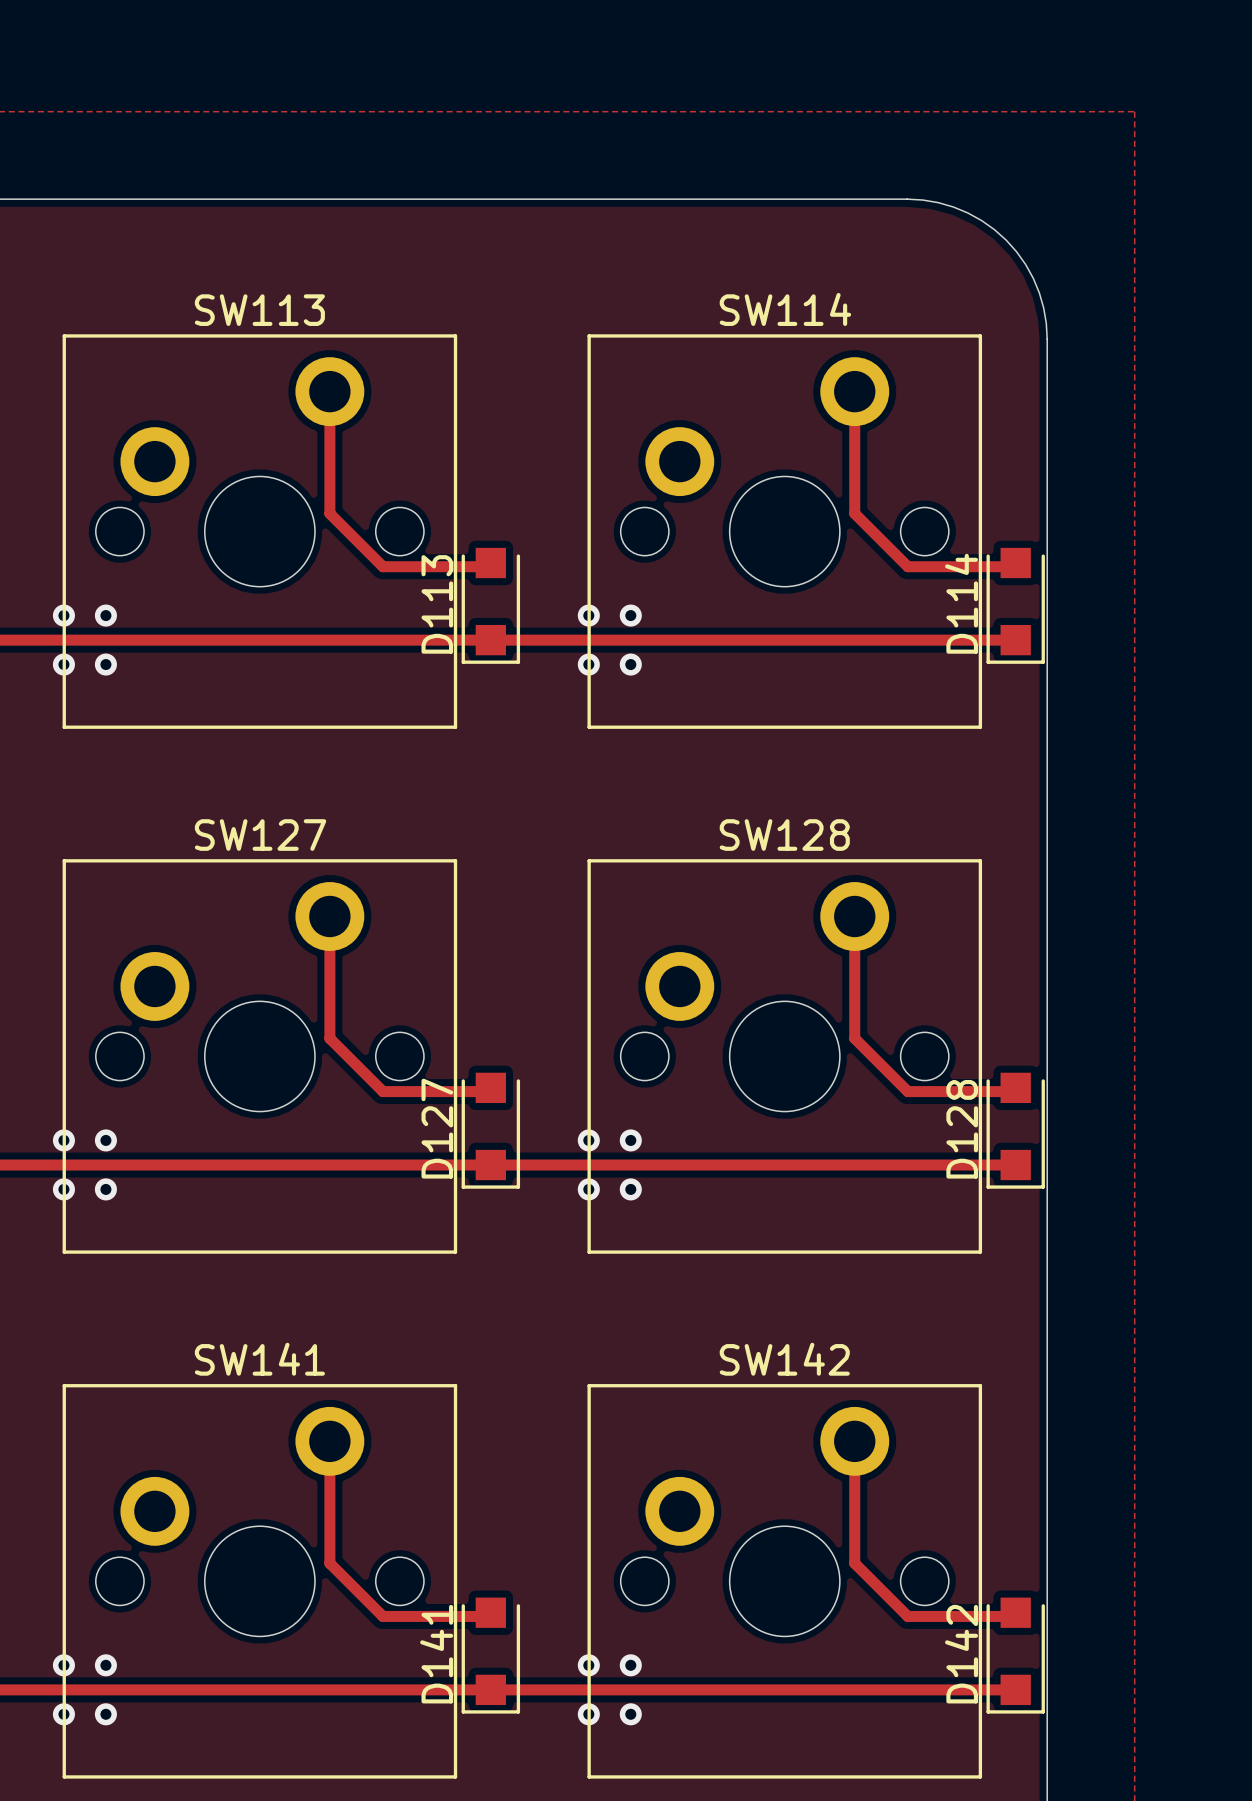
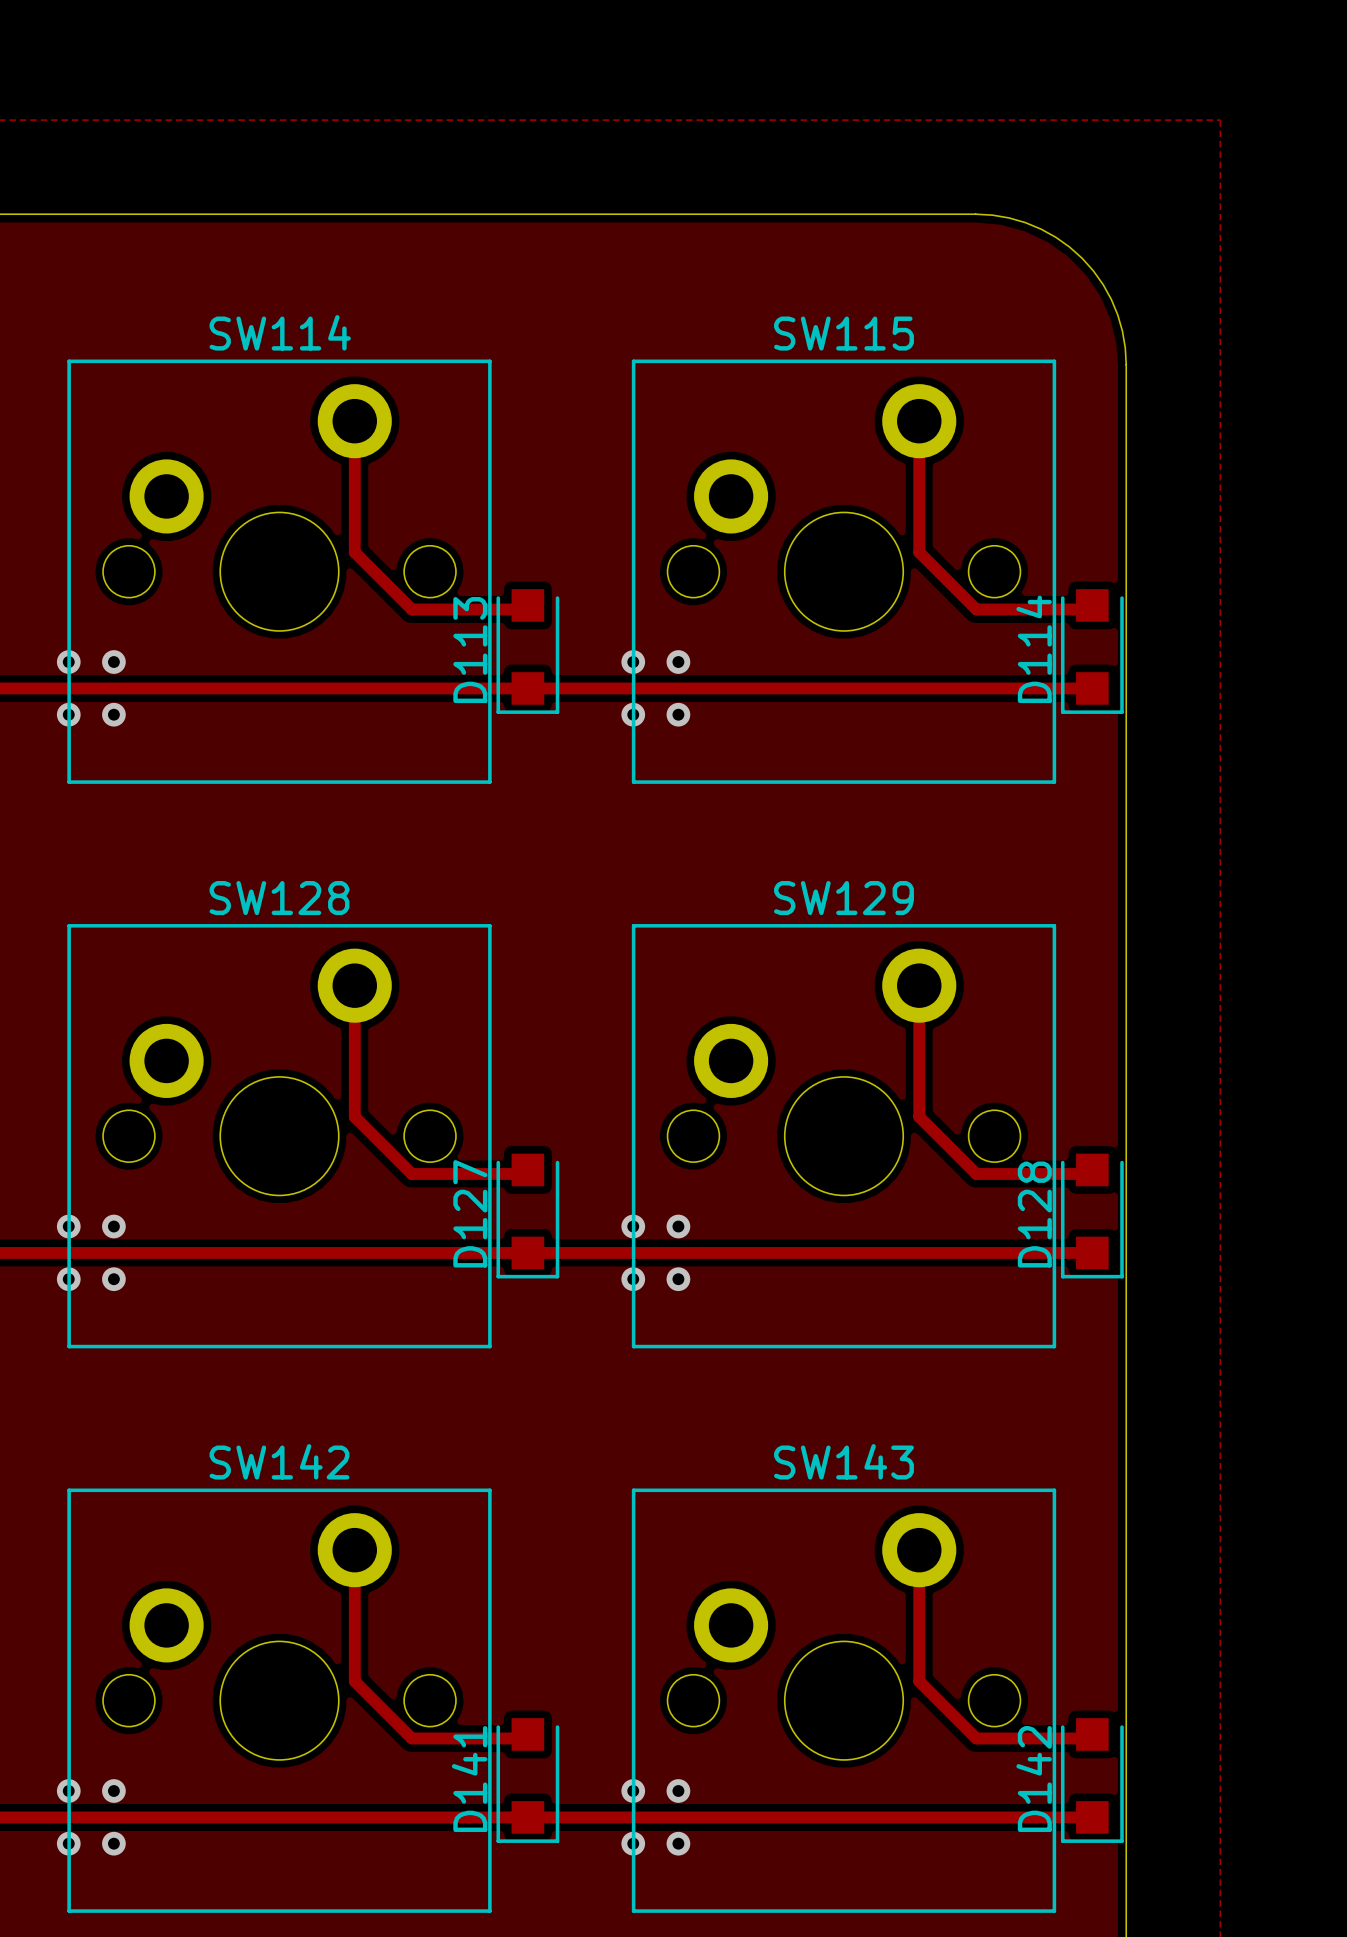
SW114 name: SW114 (785, 309) -> SW115 (843, 333)
SW113 name: SW113 (259, 310) -> SW114 (280, 332)
SW127 name: SW127 (260, 835) -> SW128 (279, 898)
SW128 name: SW128 (784, 835) -> SW129 (843, 898)
SW141 name: SW141 (259, 1359) -> SW142 (279, 1461)
SW142 name: SW142 (784, 1359) -> SW143 (843, 1461)

